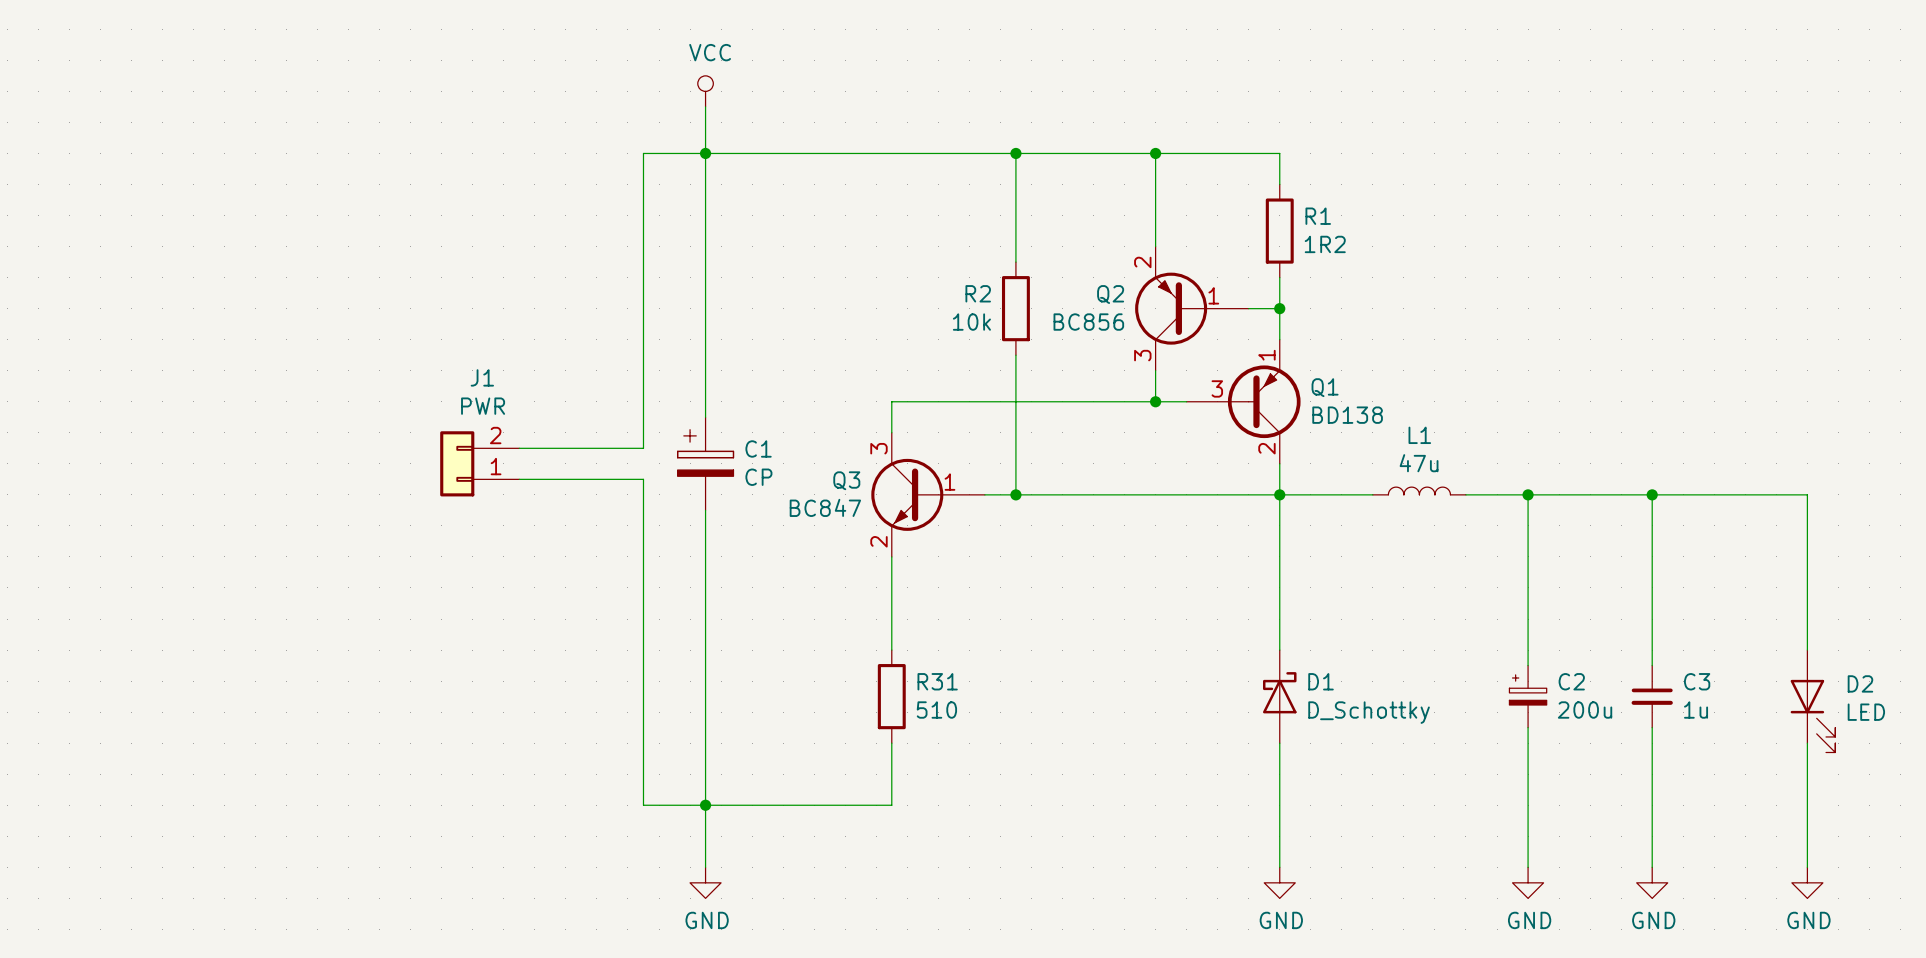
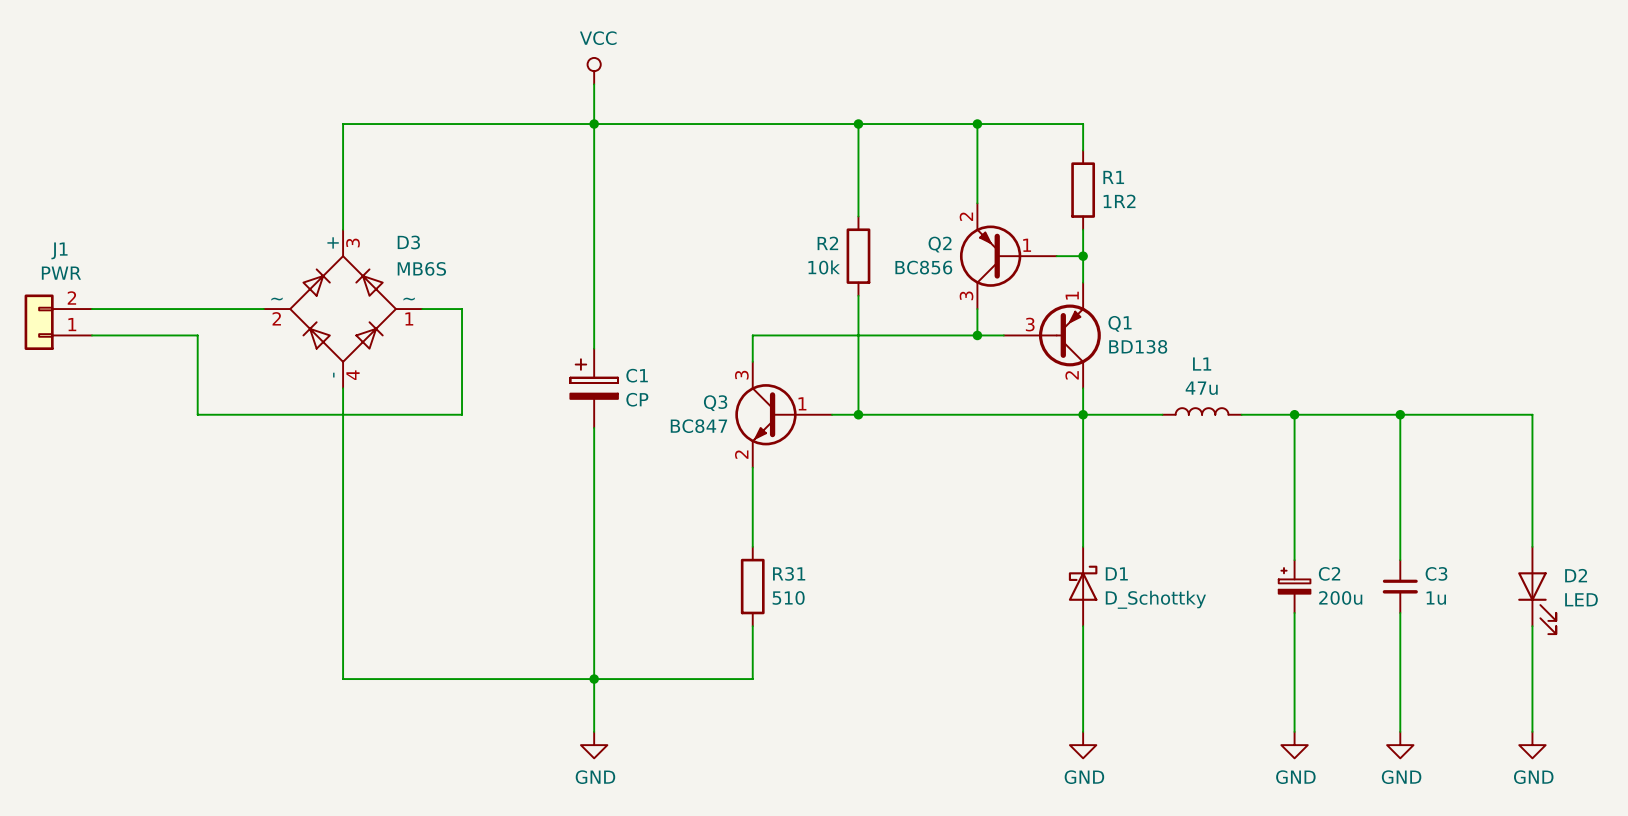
wire: (643, 153) (643, 448) (519, 448) -> (541, 124) (343, 124) (343, 229)
wire: none -> (91, 309) (263, 309)
D3: none -> MB6S (343, 309)
wire: none -> (422, 309) (462, 309) (462, 414) (197, 414) (197, 335) (91, 335)
J1 position: (479, 463) -> (58, 322)
wire: (519, 479) (643, 479) (643, 805) -> (343, 388) (343, 679) (541, 679)

